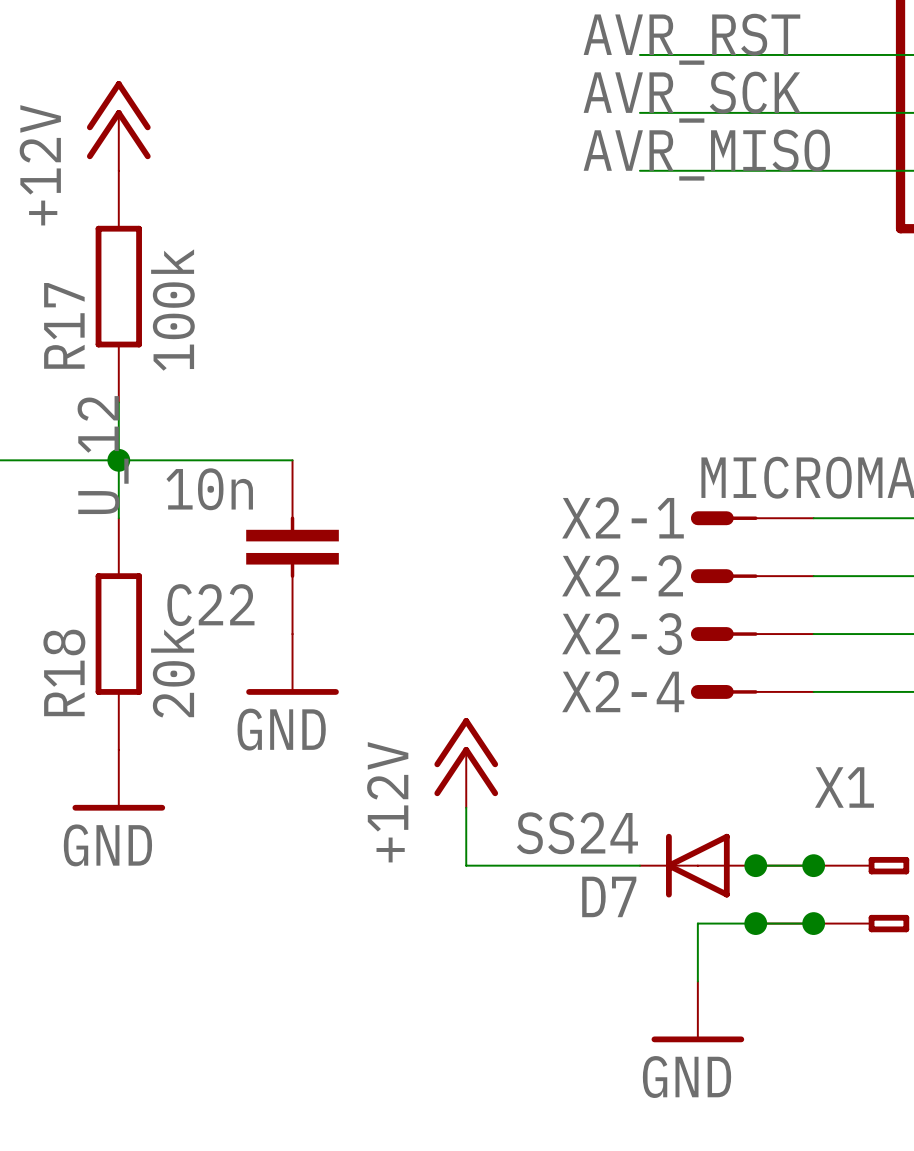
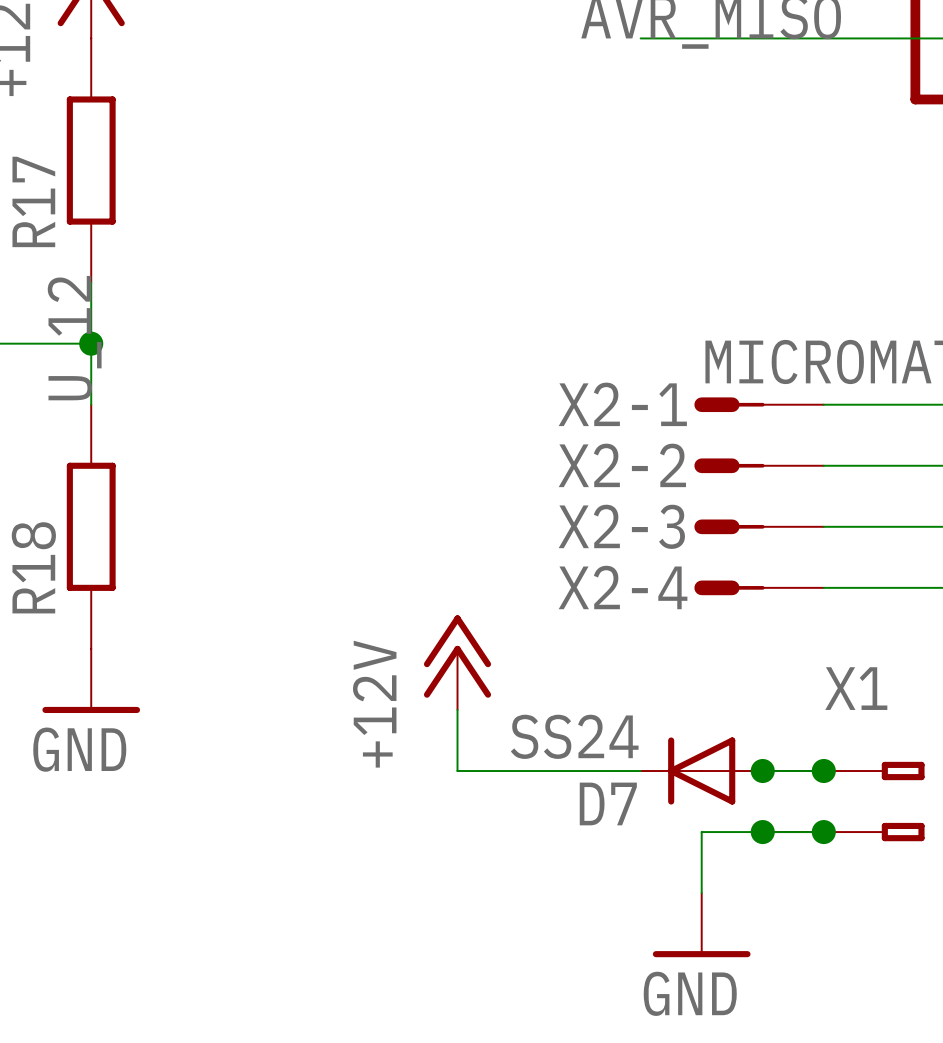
R17 value: 100k (172, 310) -> none
wire: (118, 460) (292, 460) -> none
C22: 10n (292, 547) -> none
power symbol: GND (292, 664) -> none
R18 value: 20k (172, 672) -> none

